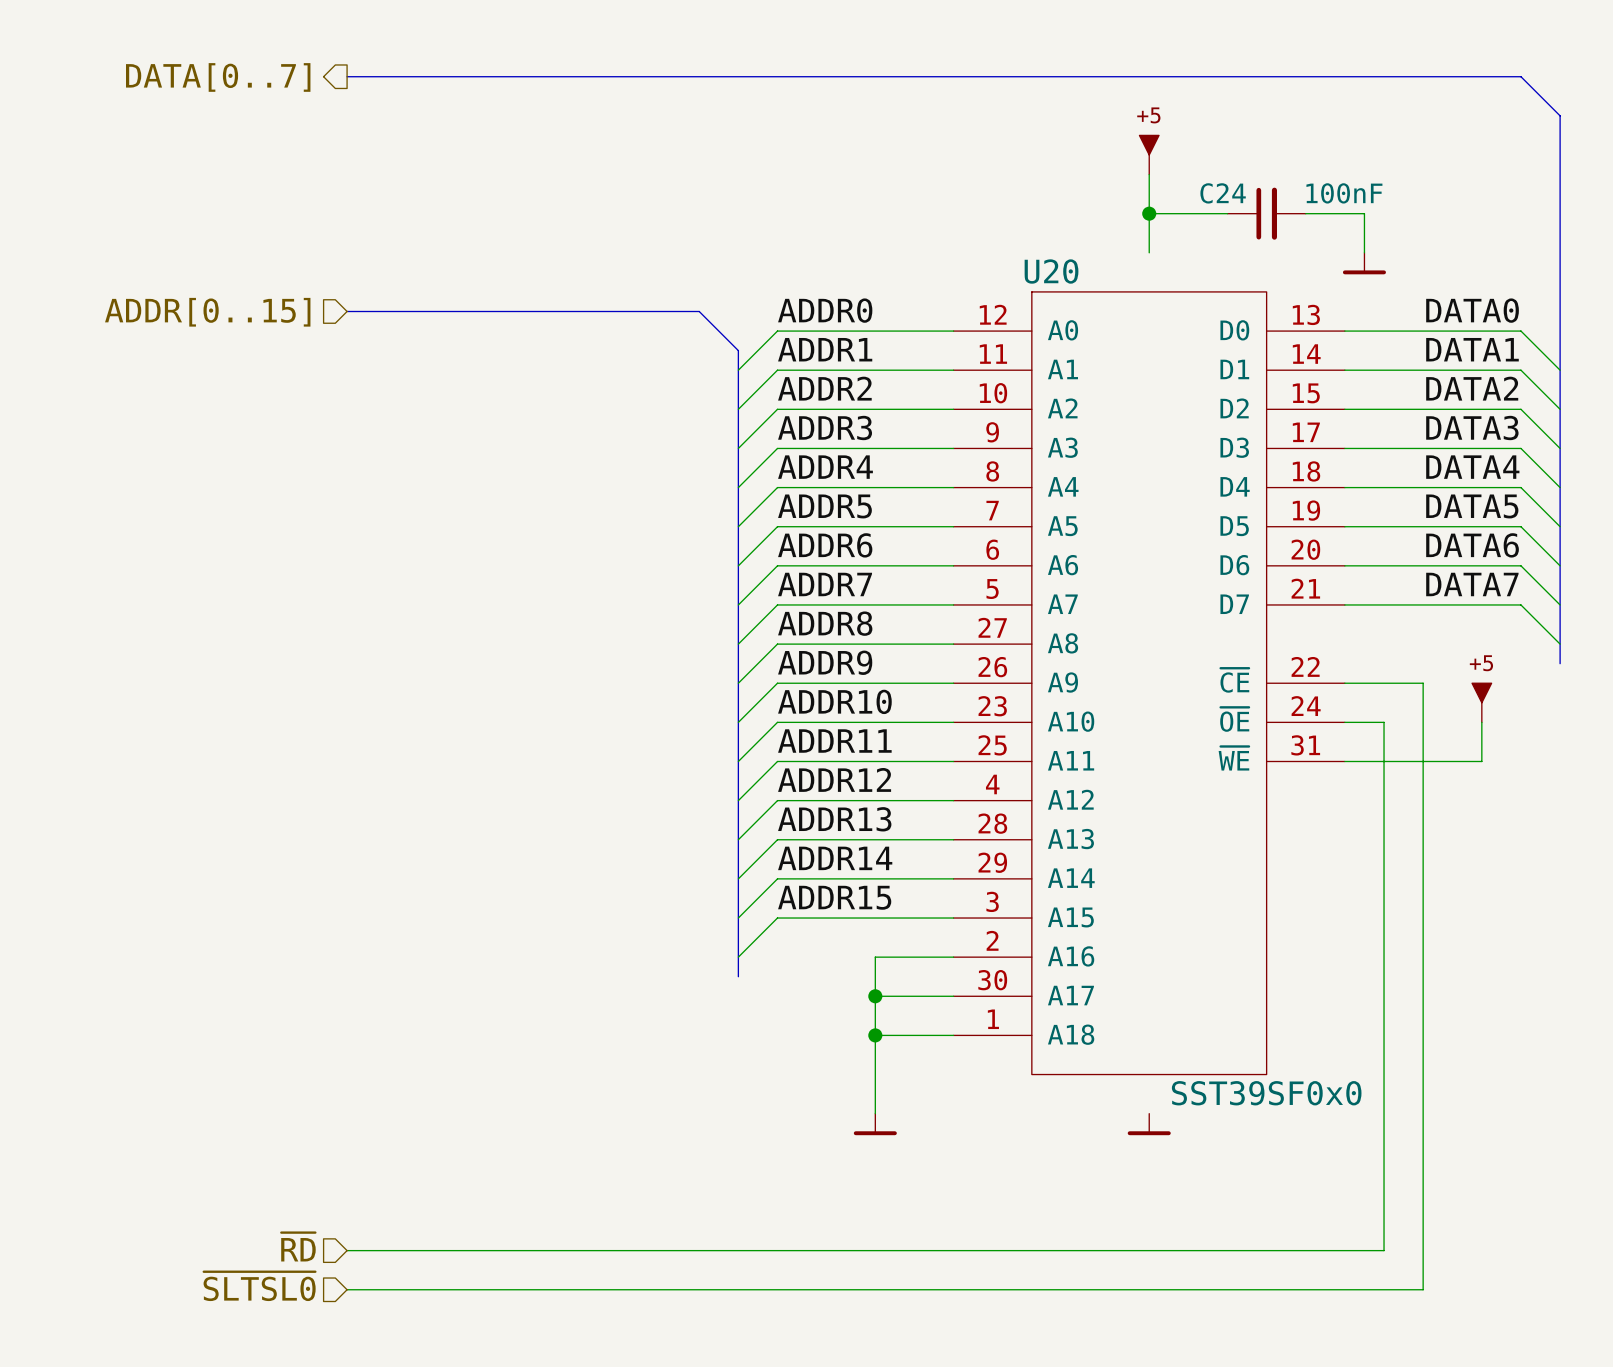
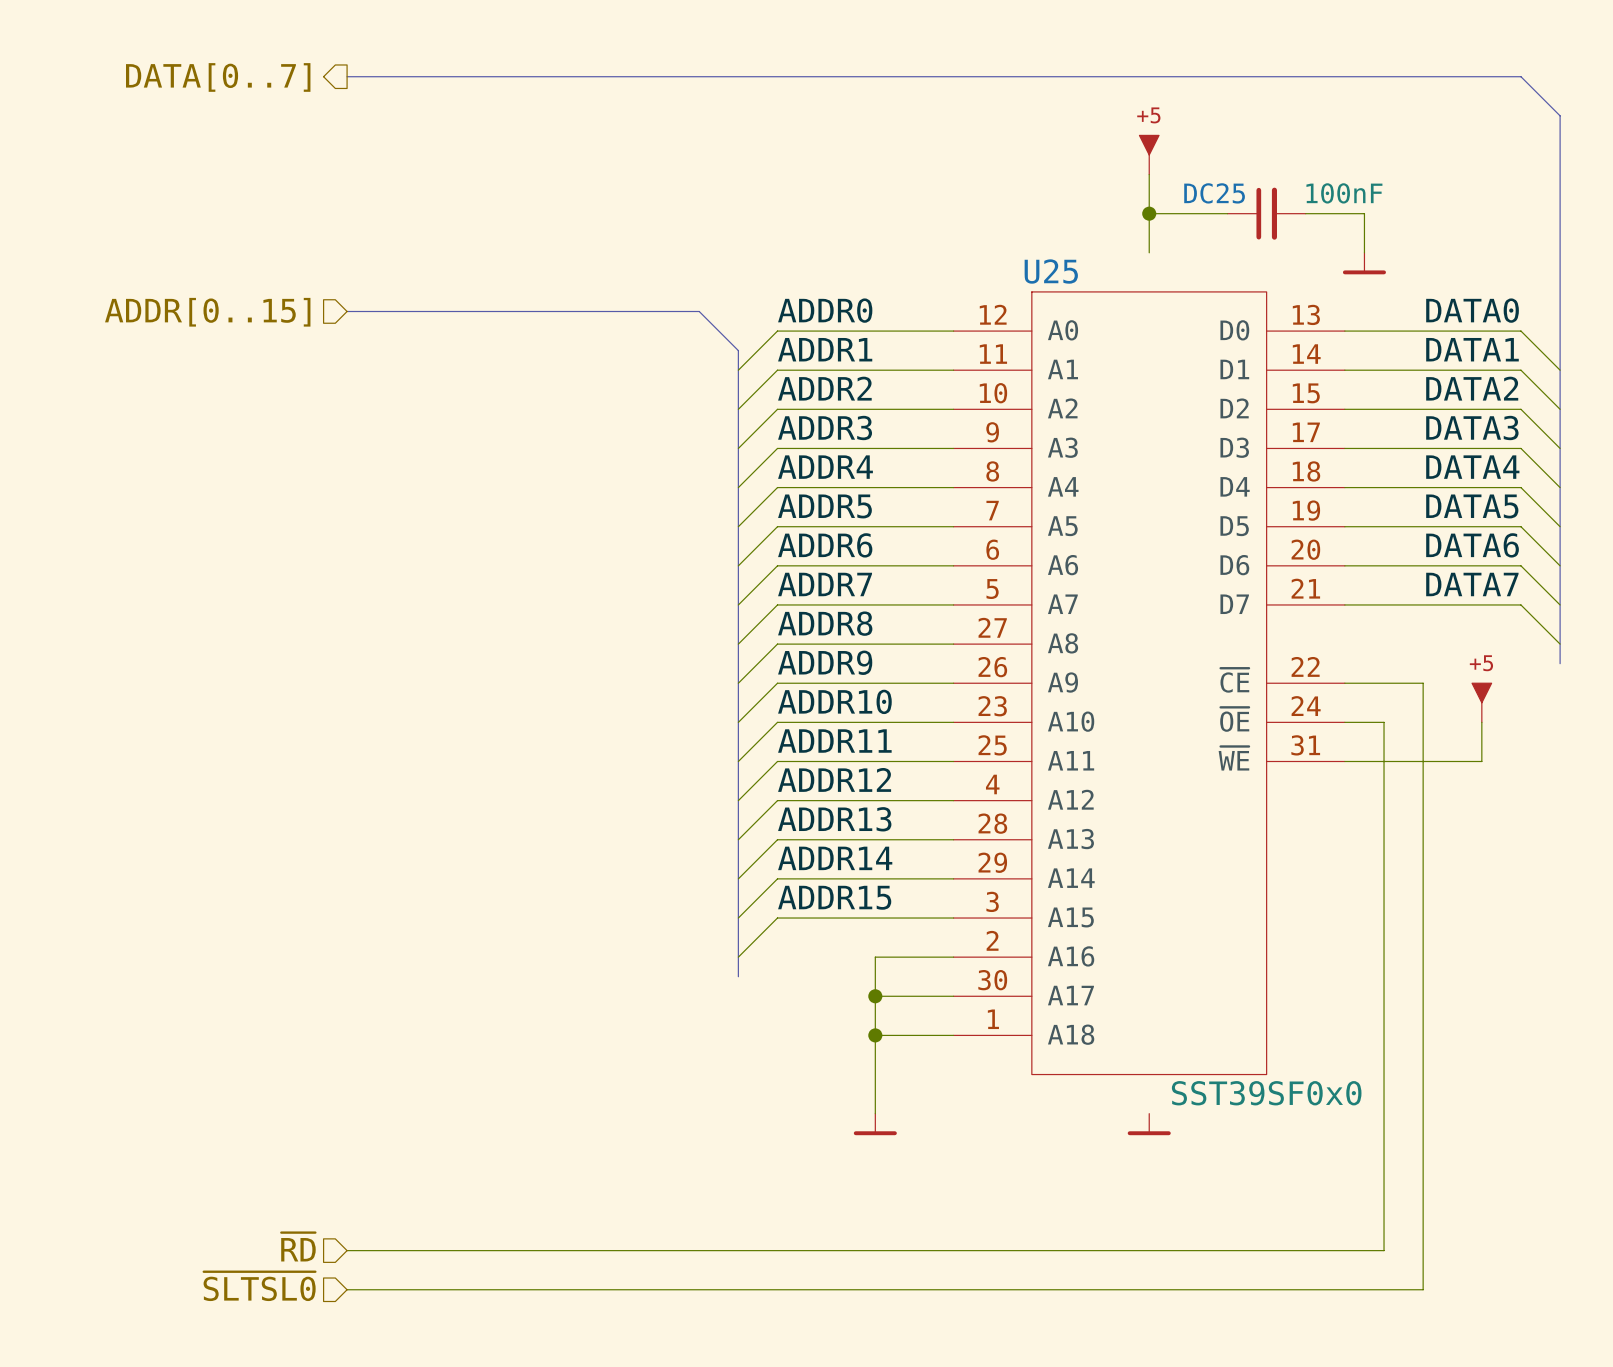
C24 name: C24 (1223, 193) -> DC25 (1214, 193)
U20 name: U20 (1051, 271) -> U25 (1051, 271)

